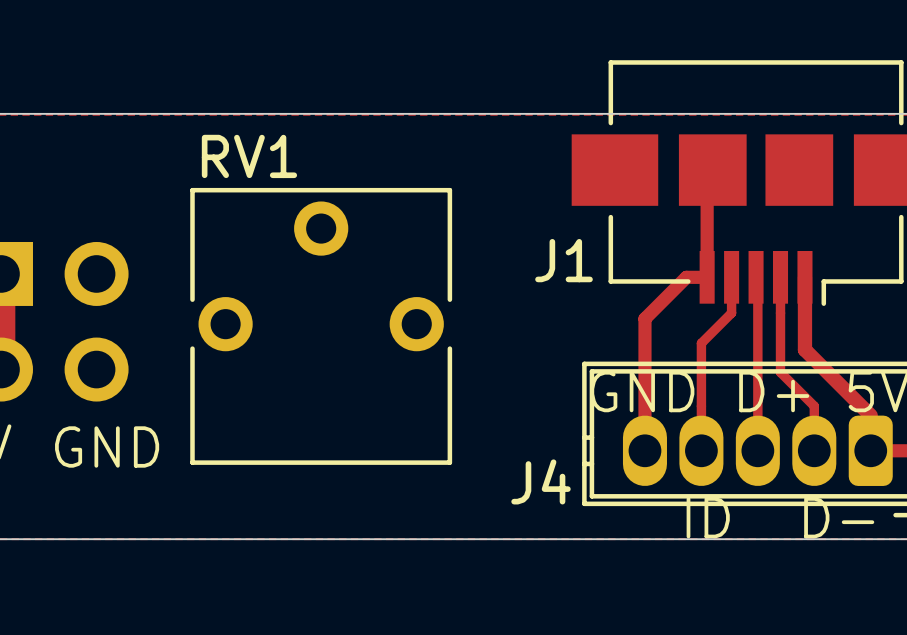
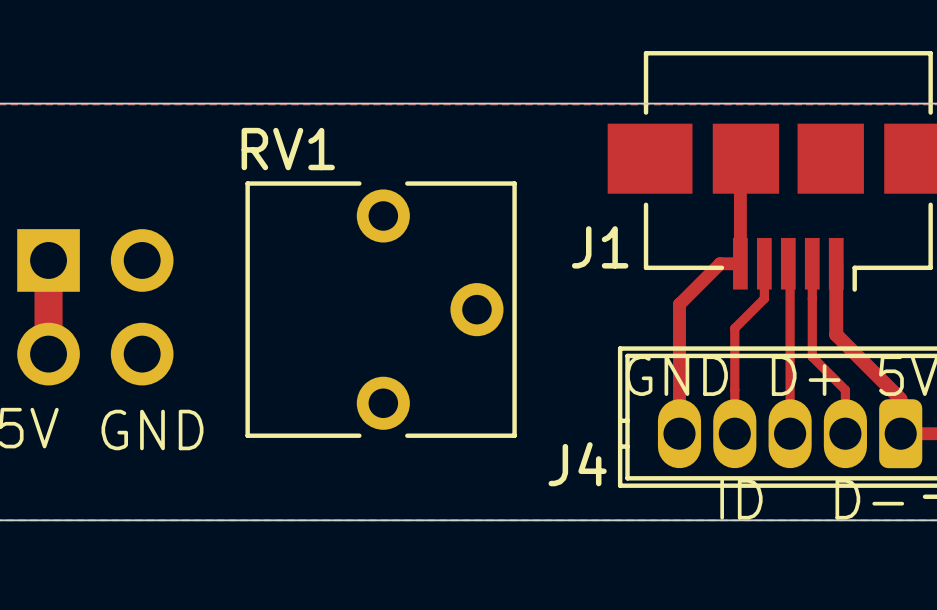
RV1 rotation: 0° (321, 326) -> 90° clockwise (381, 309)

